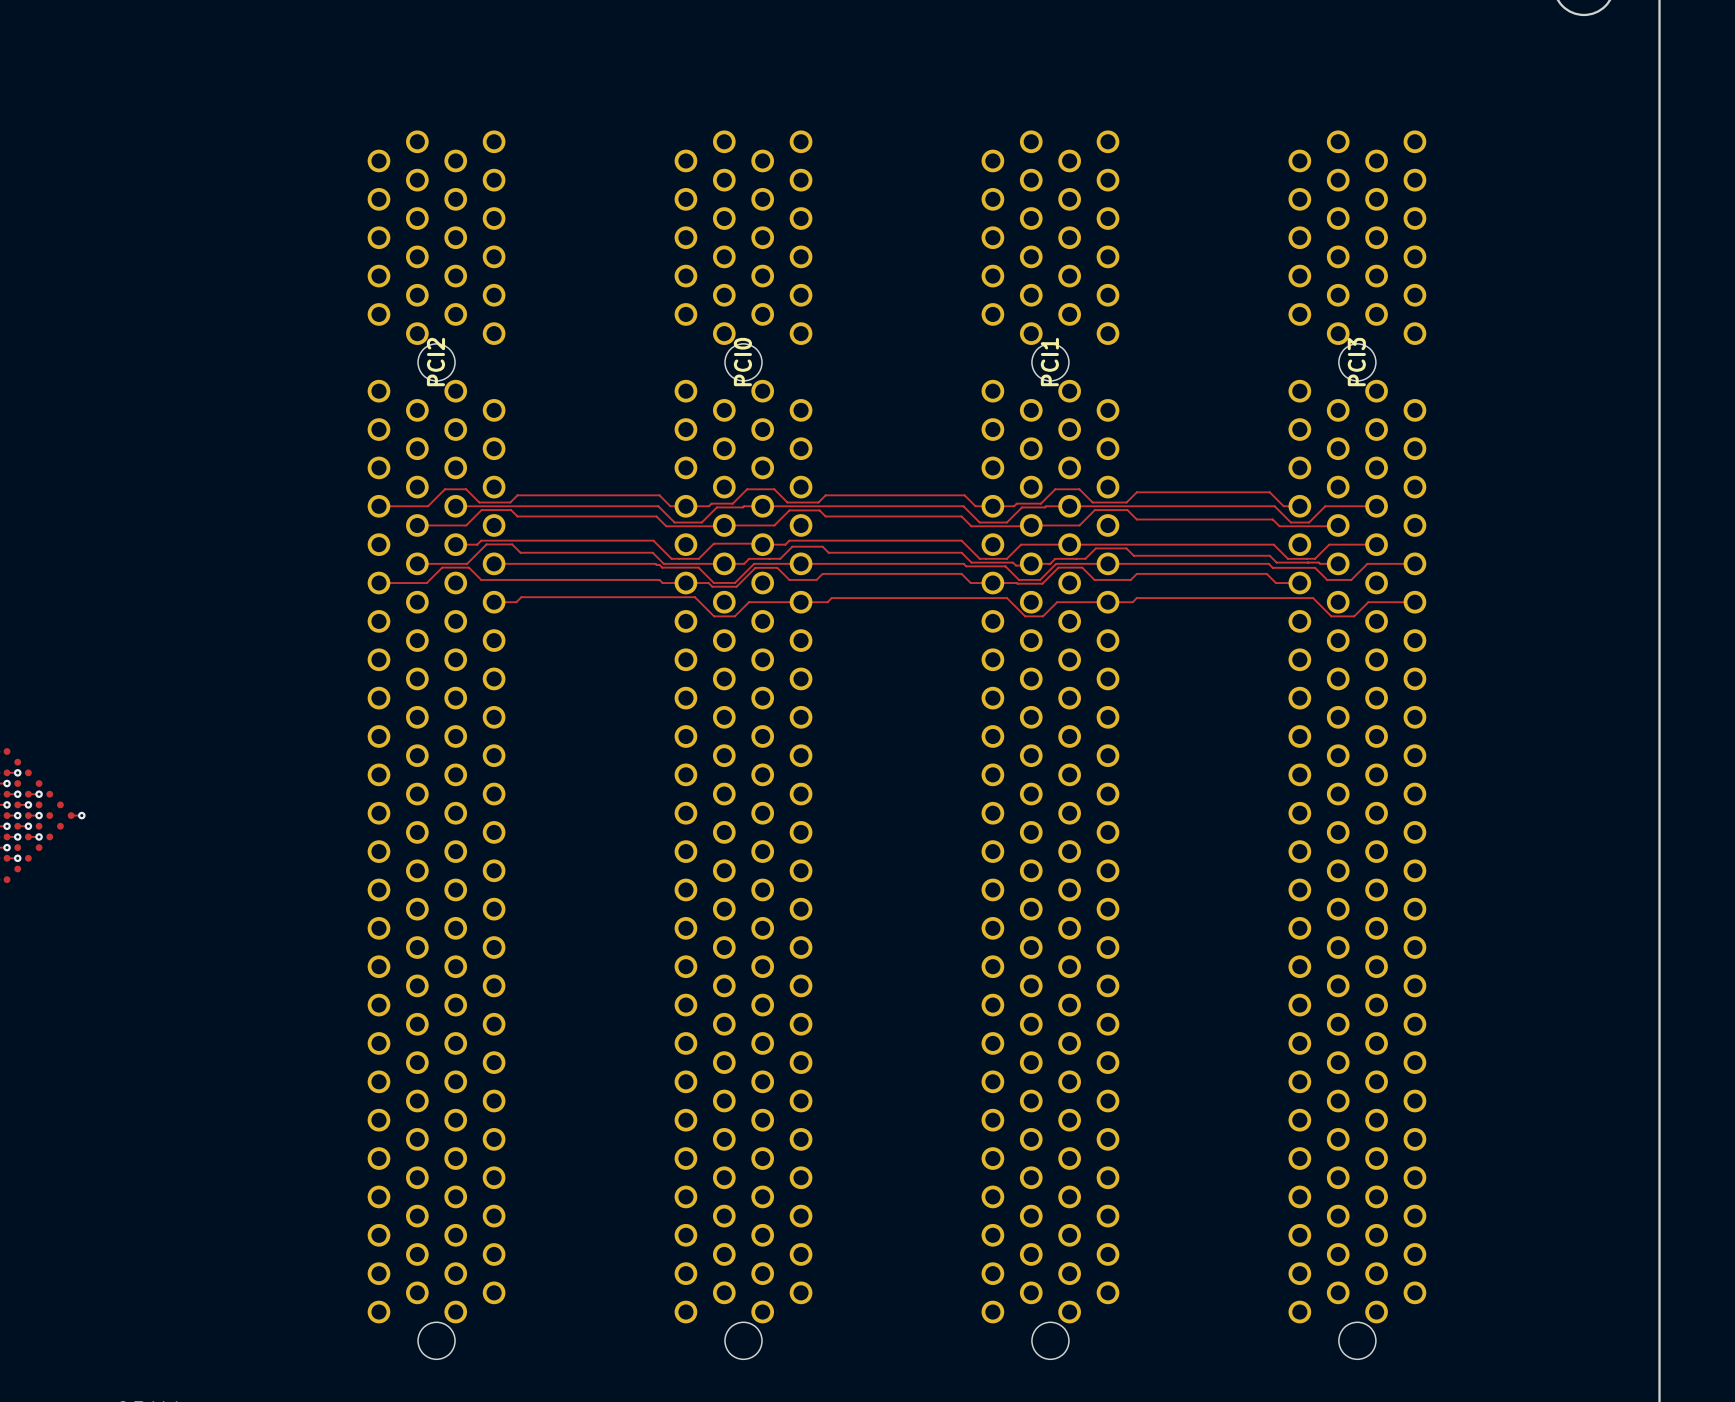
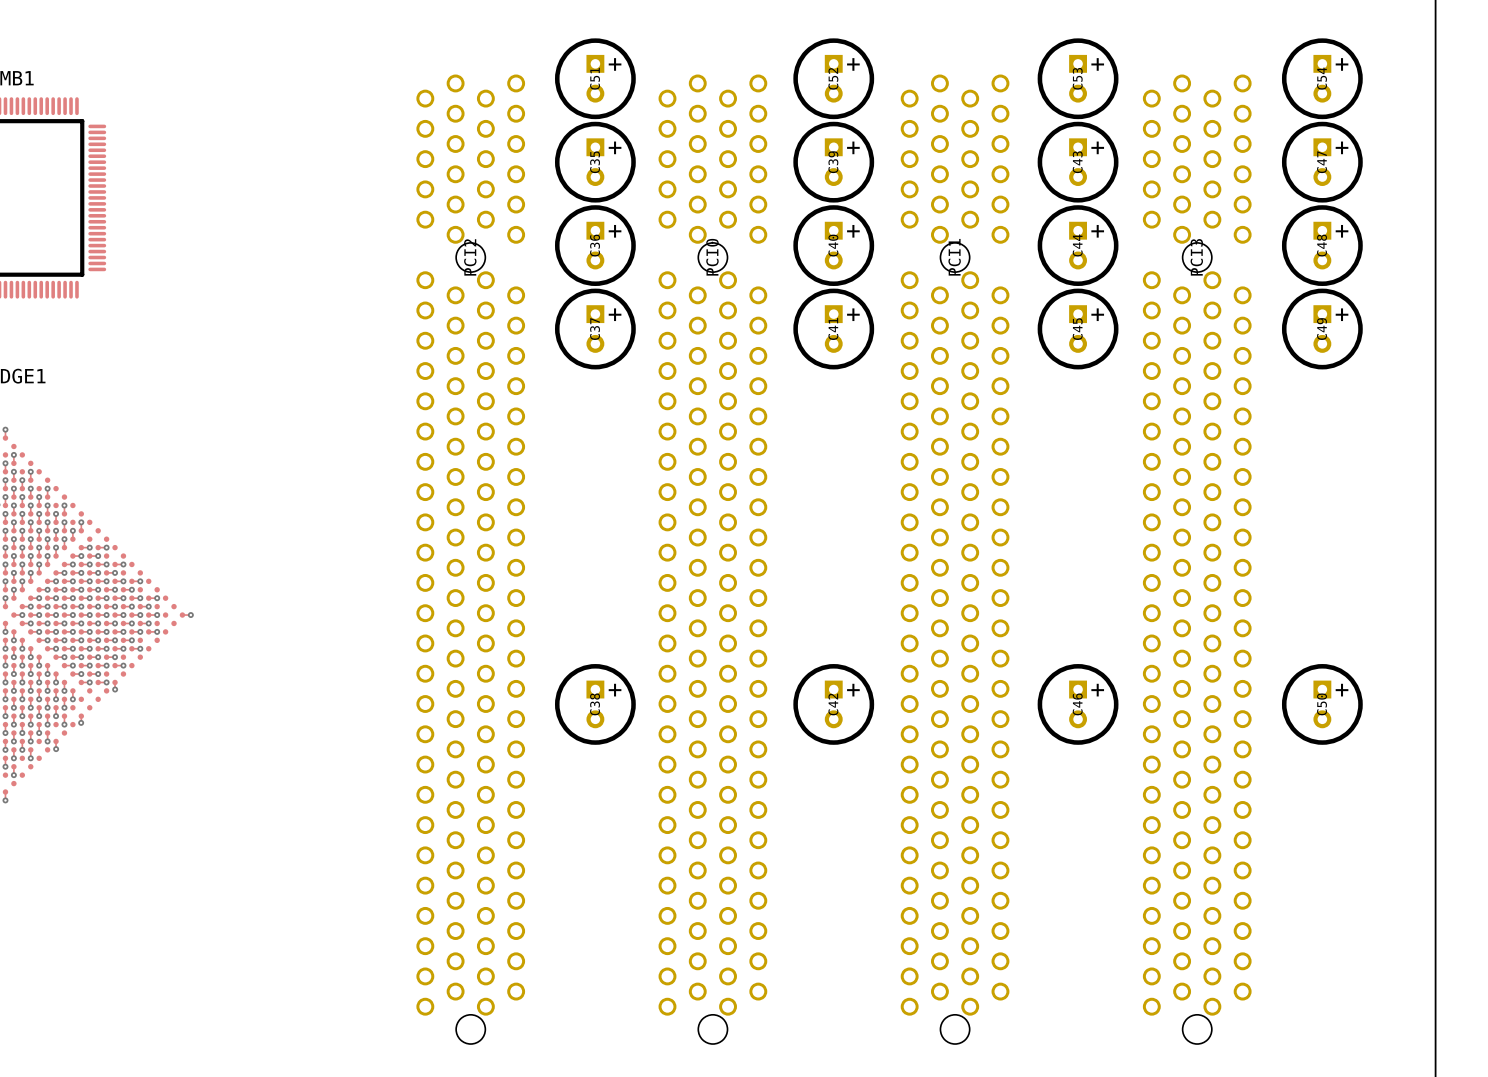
C51: none -> (595, 78)
C52: none -> (833, 78)
C53: none -> (1078, 78)
C54: none -> (1322, 78)
C35: none -> (595, 162)
C39: none -> (833, 162)
C43: none -> (1078, 162)
C47: none -> (1322, 162)
C36: none -> (595, 245)
C40: none -> (833, 245)
C44: none -> (1078, 245)
C48: none -> (1322, 245)
C37: none -> (595, 329)
C41: none -> (833, 329)
C45: none -> (1078, 329)
C49: none -> (1322, 329)
track: (378, 506) (428, 506) (445, 489) (466, 489) (479, 502) (510, 502) (517, 495) (659, 495) (670, 506) (708, 506) (711, 503) (732, 503) (747, 489) (774, 489) (787, 502) (818, 502) (825, 495) (964, 495) (975, 506) (1014, 506) (1016, 503) (1040, 503) (1055, 489) (1079, 489) (1092, 502) (1126, 502) (1136, 492) (1269, 492) (1283, 506) (1299, 506) -> none
track: (455, 506) (658, 506) (674, 522) (701, 522) (716, 507) (744, 506) (963, 506) (979, 522) (1006, 522) (1022, 507) (1274, 506) (1290, 522) (1309, 522) (1325, 506) (1376, 506) -> none
track: (417, 525) (466, 525) (481, 510) (511, 510) (517, 516) (656, 516) (666, 526) (774, 525) (789, 510) (819, 510) (825, 516) (961, 516) (971, 526) (1079, 525) (1094, 510) (1127, 510) (1136, 519) (1272, 519) (1279, 526) (1338, 525) -> none
track: (455, 544) (477, 544) (481, 540) (653, 540) (671, 558) (698, 558) (713, 543) (785, 544) (789, 540) (961, 540) (979, 558) (1006, 558) (1021, 544) (1273, 544) (1287, 558) (1315, 558) (1329, 544) (1376, 544) -> none
track: (417, 563) (467, 563) (486, 544) (512, 544) (520, 552) (652, 552) (663, 563) (744, 563) (749, 558) (780, 558) (792, 546) (822, 546) (828, 552) (961, 552) (971, 562) (1013, 562) (1016, 565) (1050, 563) (1055, 558) (1085, 558) (1095, 548) (1126, 548) (1133, 555) (1269, 555) (1276, 562) (1338, 563) -> none
track: (494, 563) (655, 563) (662, 567) (698, 567) (713, 582) (735, 582) (754, 563) (963, 563) (966, 566) (1005, 566) (1019, 579) (1040, 579) (1056, 563) (1268, 563) (1272, 567) (1315, 567) (1327, 579) (1351, 579) (1367, 563) (1414, 563) -> none
track: (378, 583) (426, 583) (442, 567) (468, 567) (481, 579) (659, 579) (662, 583) (708, 583) (712, 586) (736, 586) (755, 567) (777, 567) (789, 579) (816, 579) (822, 573) (961, 573) (970, 583) (1042, 583) (1058, 567) (1082, 567) (1094, 579) (1130, 579) (1136, 573) (1266, 573) (1275, 583) (1299, 583) -> none
track: (494, 602) (516, 602) (521, 597) (694, 597) (714, 616) (734, 616) (749, 602) (827, 602) (831, 598) (1006, 598) (1025, 616) (1042, 616) (1057, 602) (1132, 602) (1136, 598) (1313, 598) (1331, 616) (1354, 616) (1368, 602) (1414, 602) -> none
C38: none -> (595, 704)
C42: none -> (833, 704)
C46: none -> (1078, 704)
C50: none -> (1322, 704)

